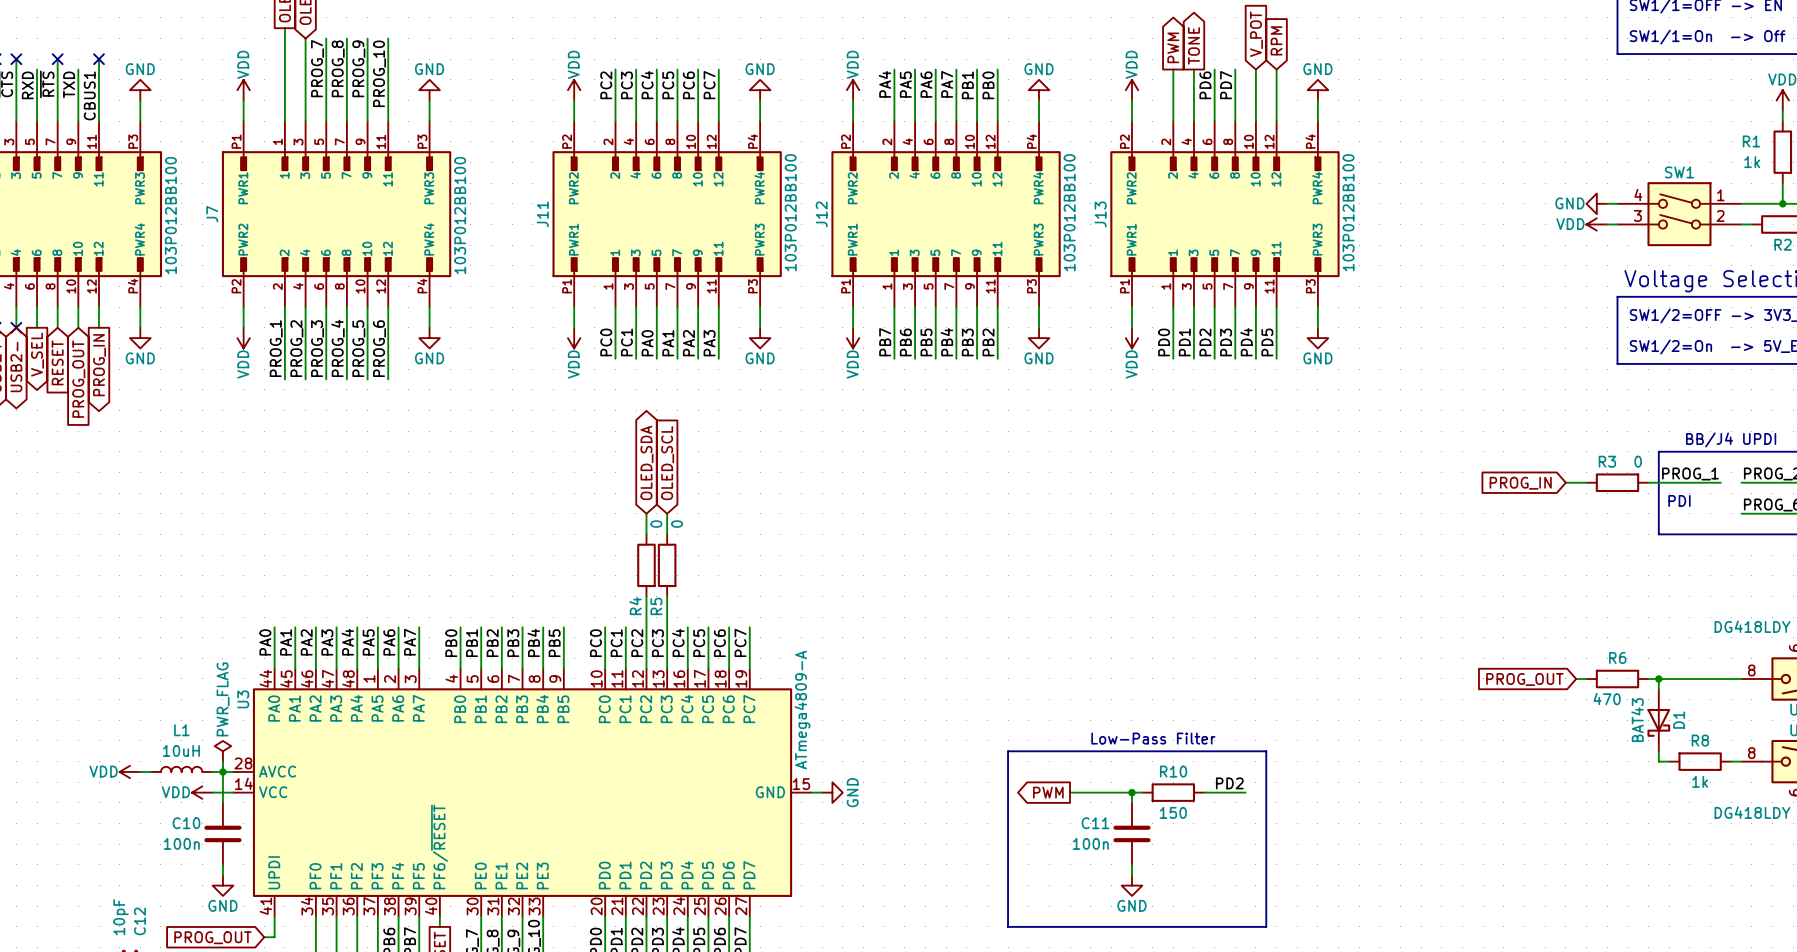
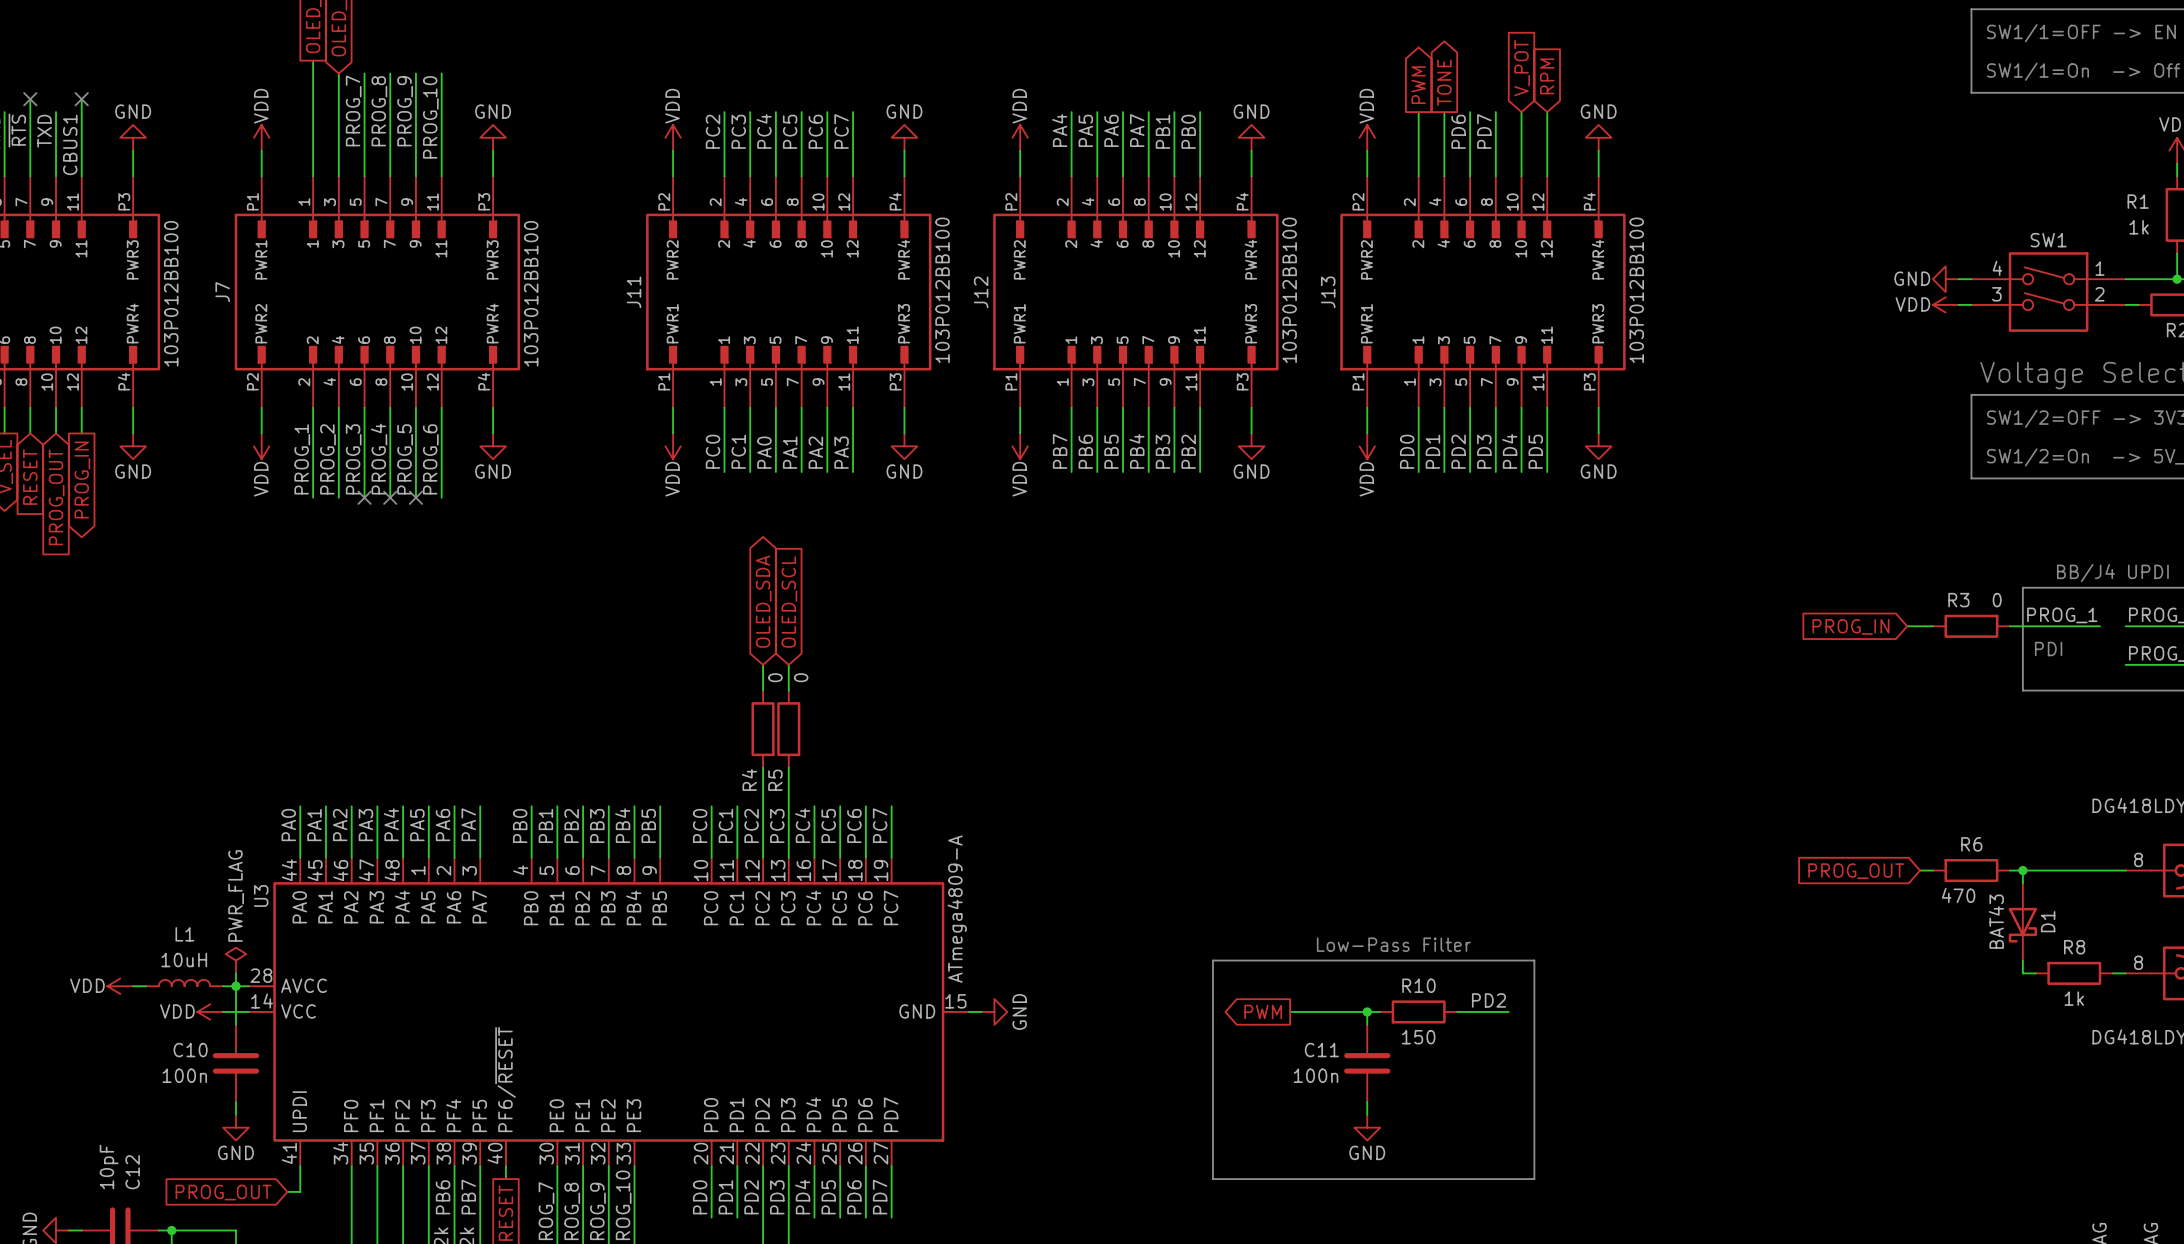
no-connect mark: none -> (364, 497)
no-connect mark: none -> (390, 497)
no-connect mark: none -> (415, 497)

